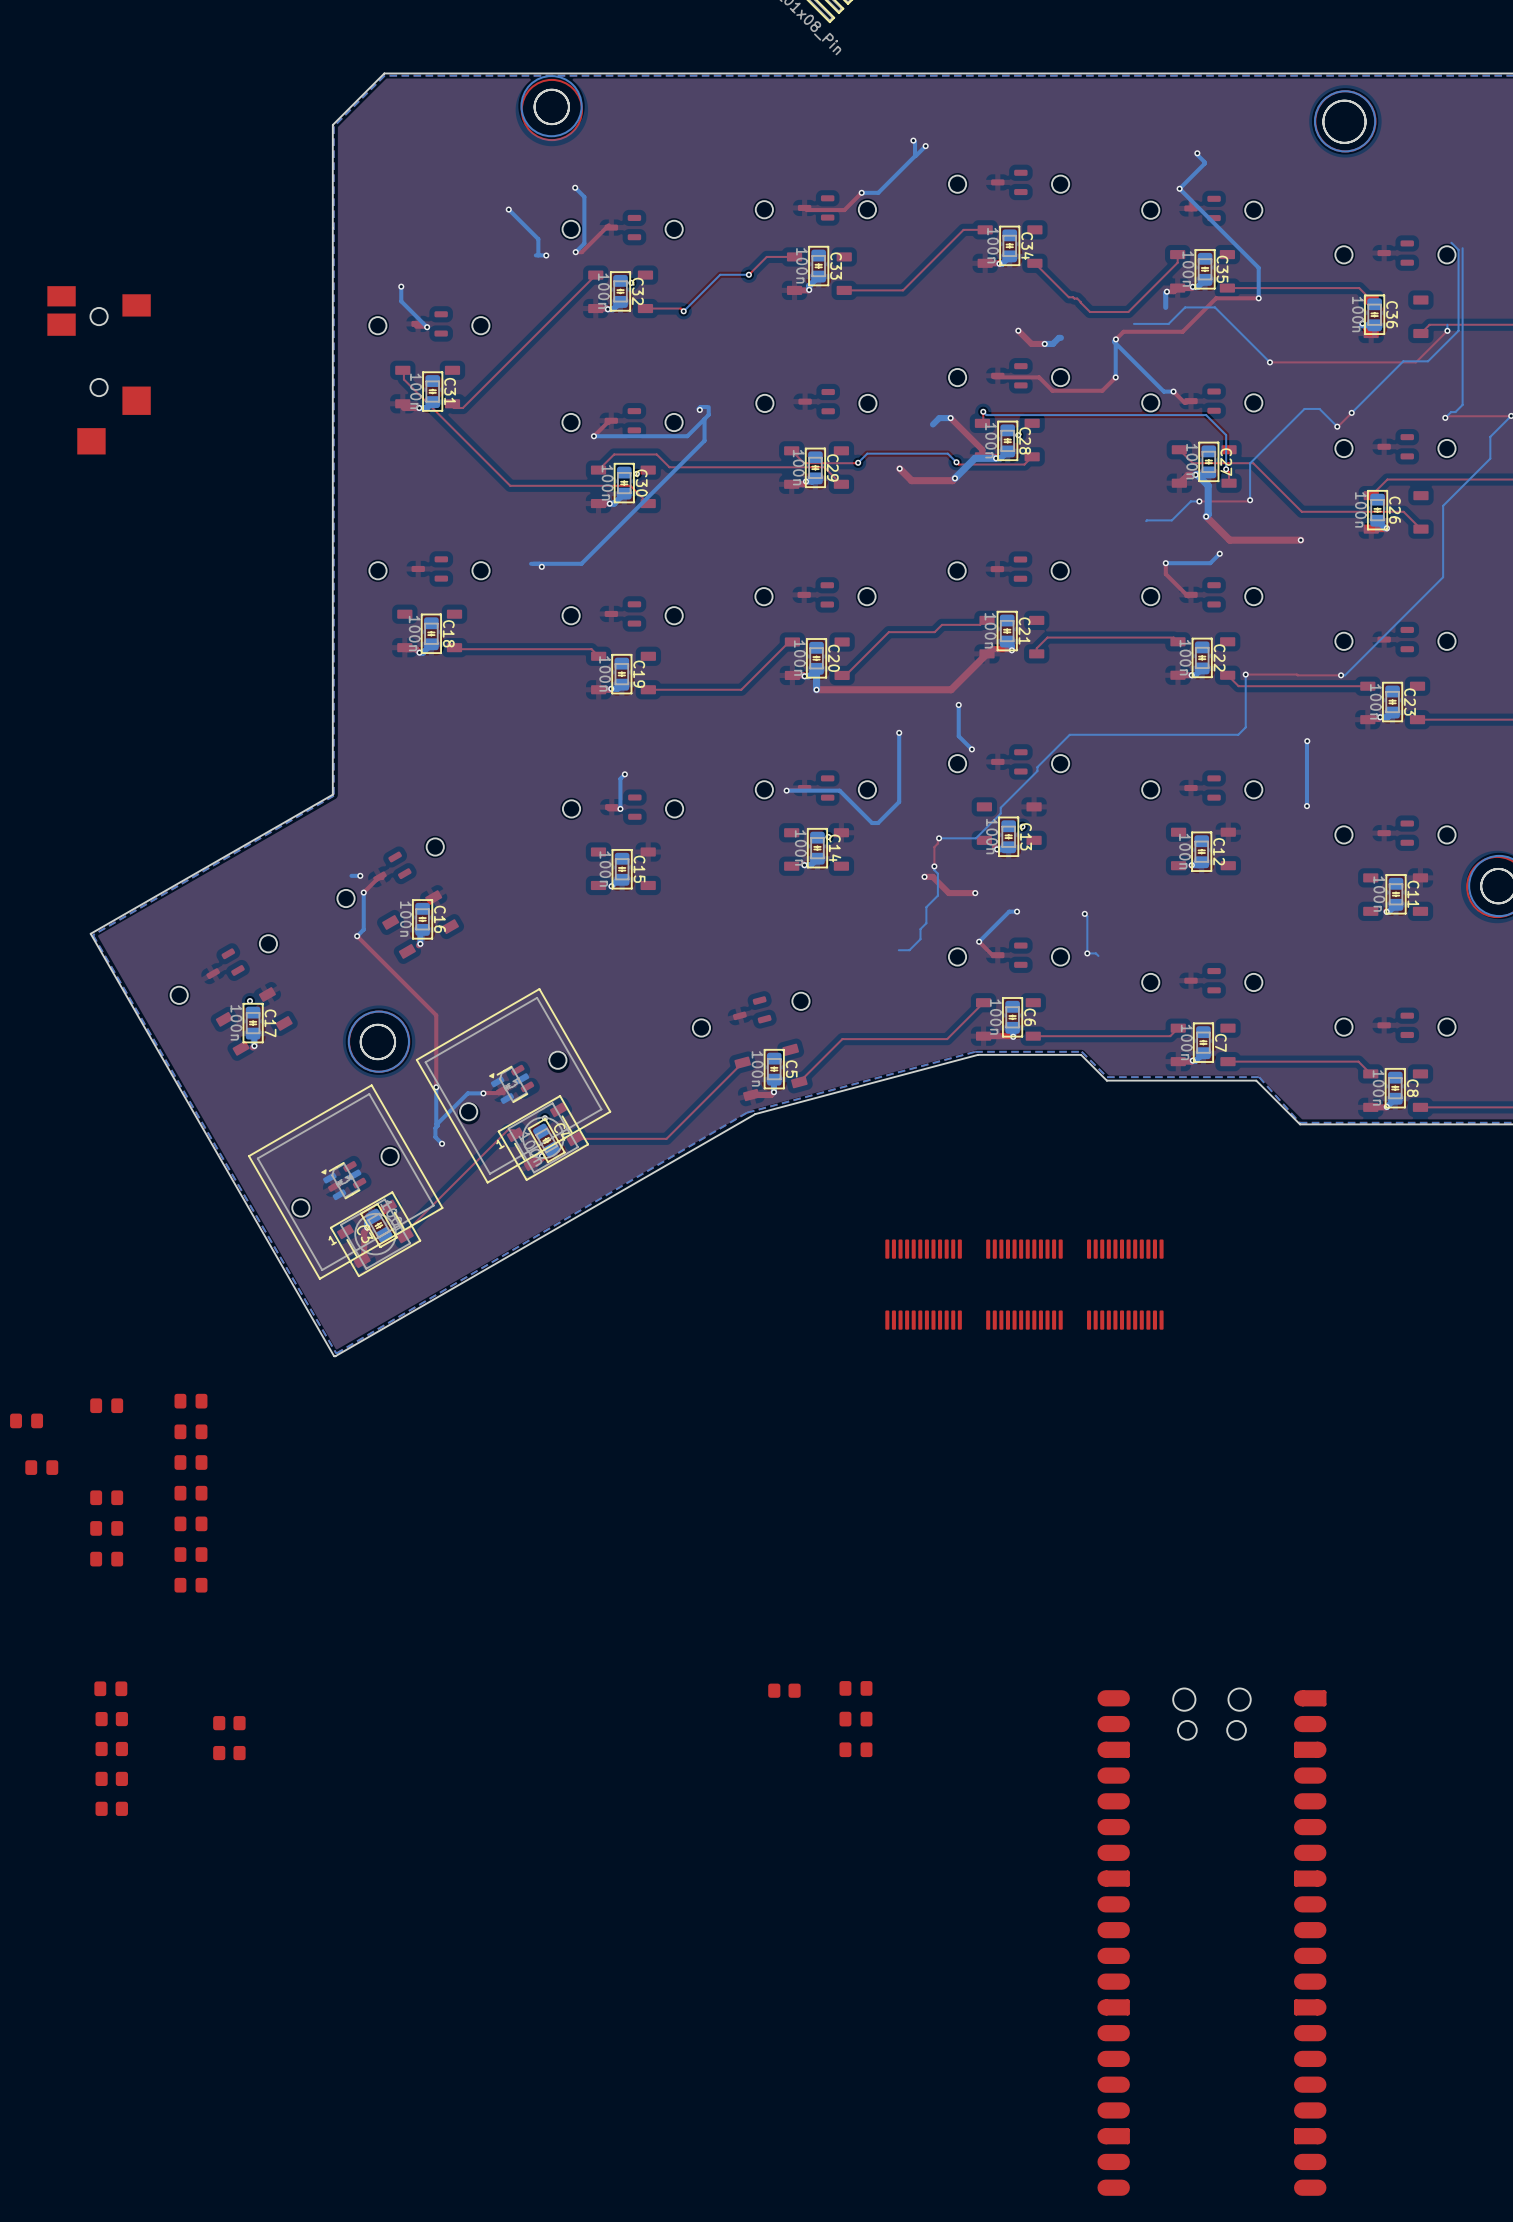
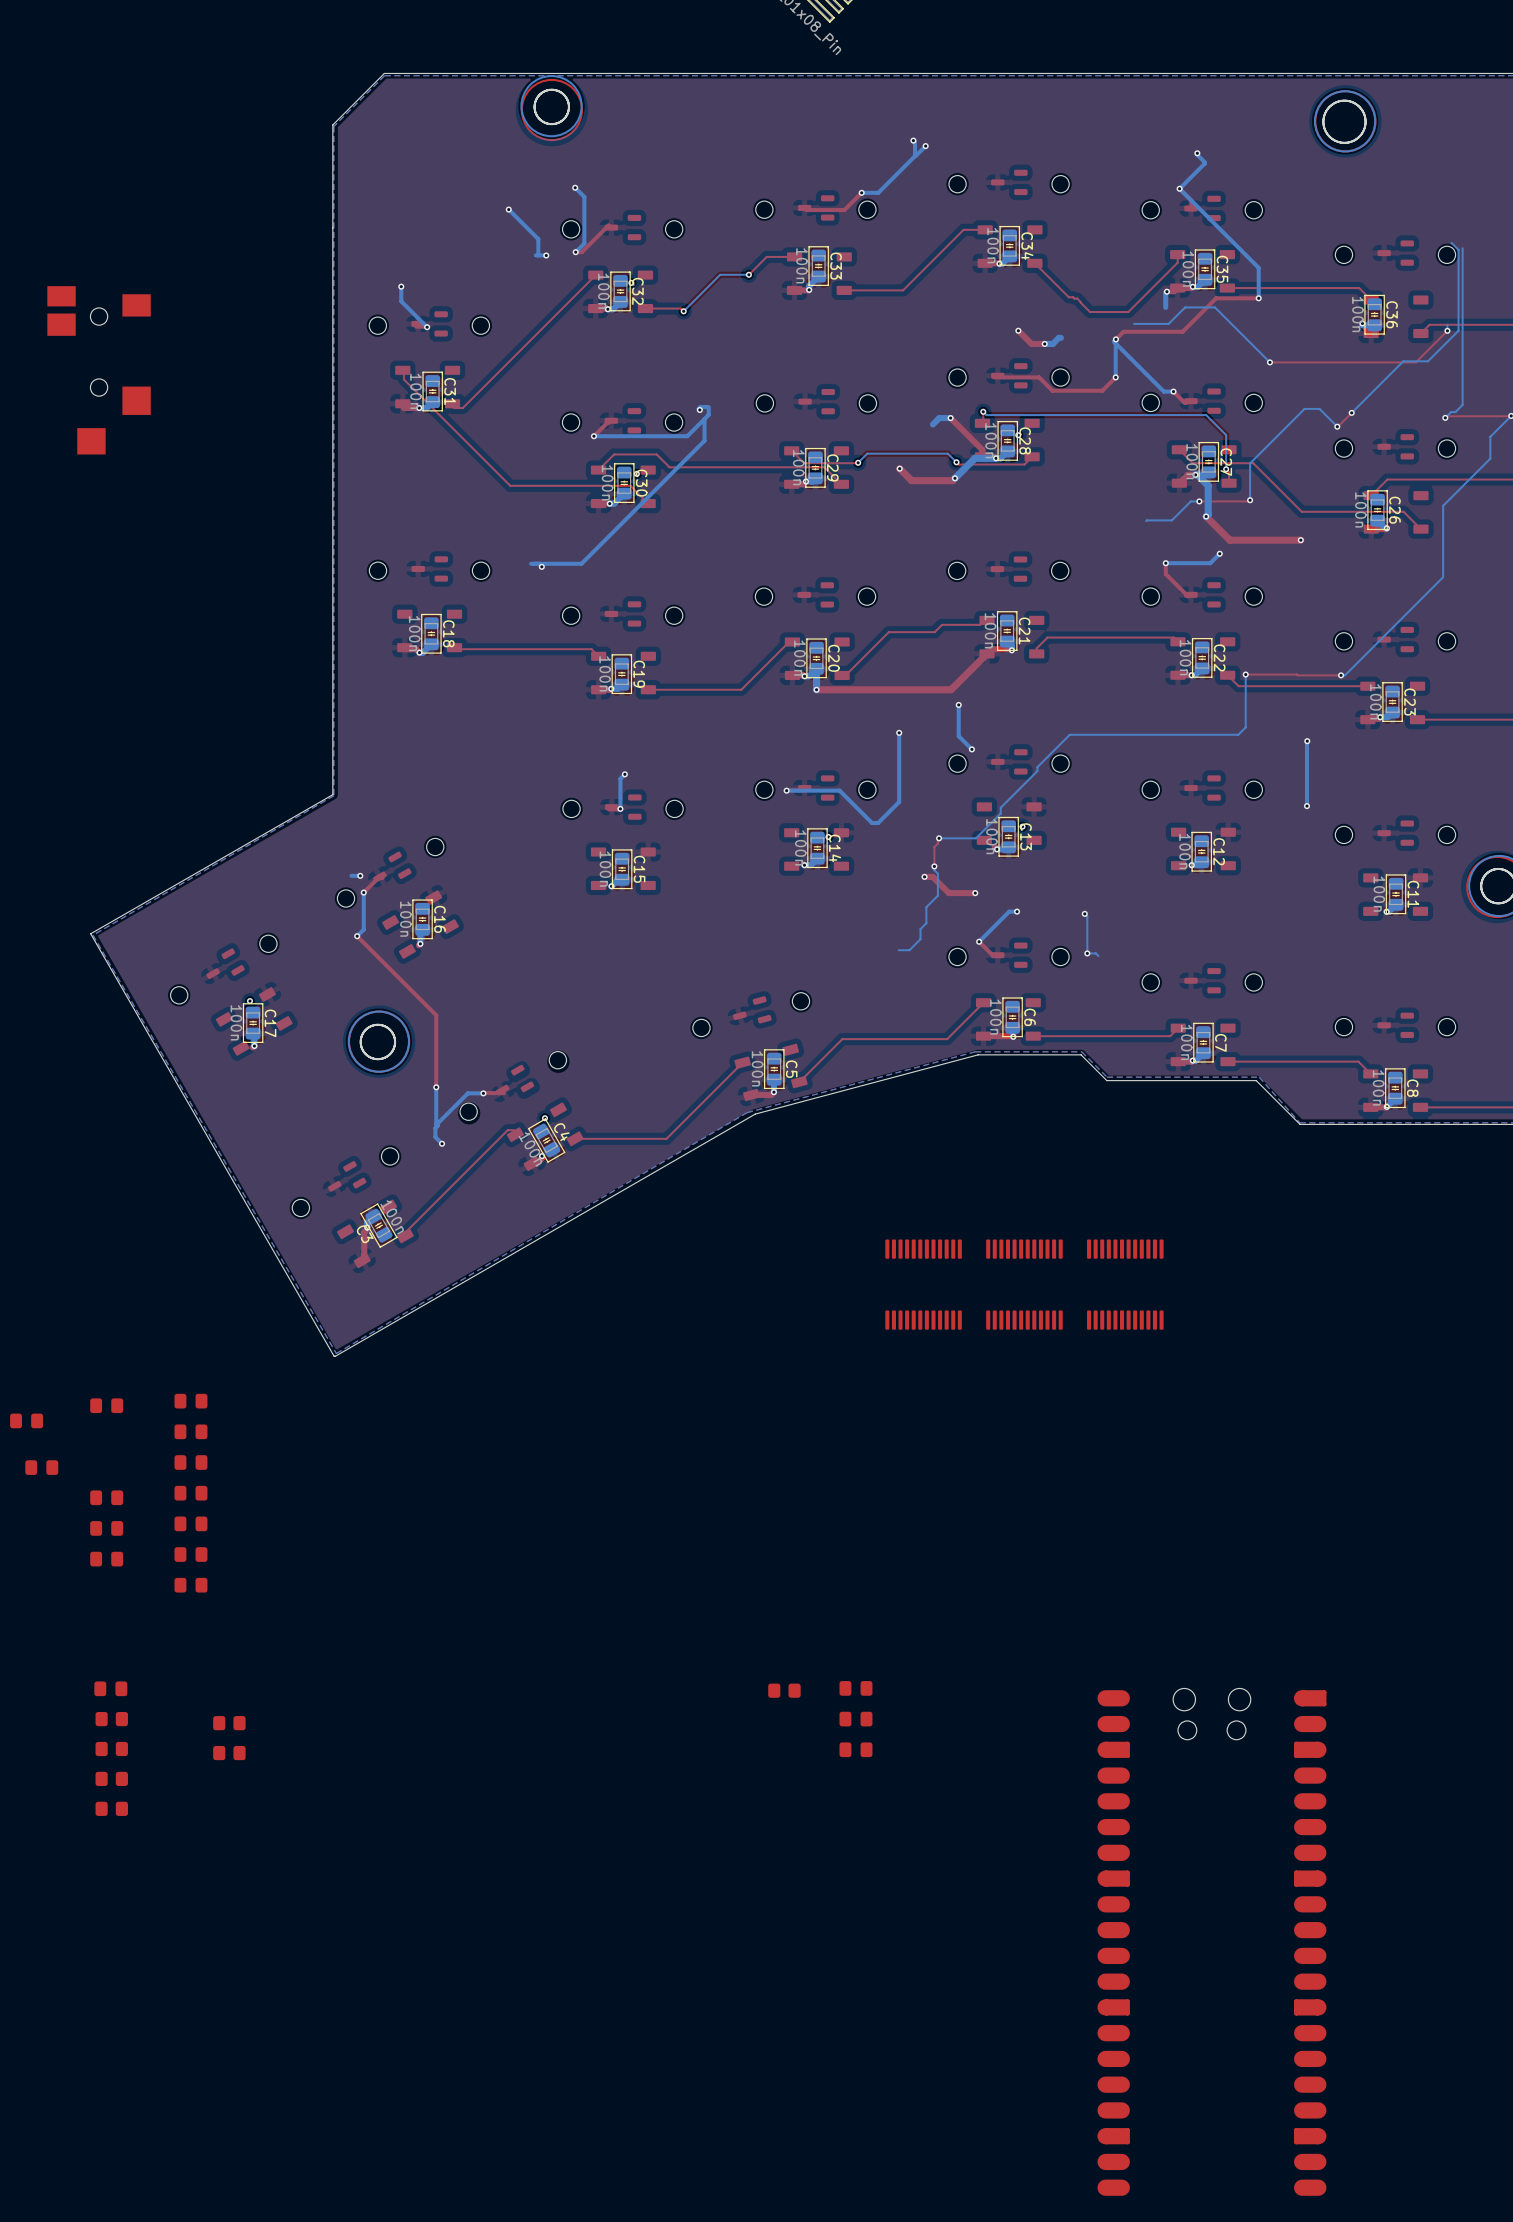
part: (513, 1085) -> none
part: (345, 1182) -> none

